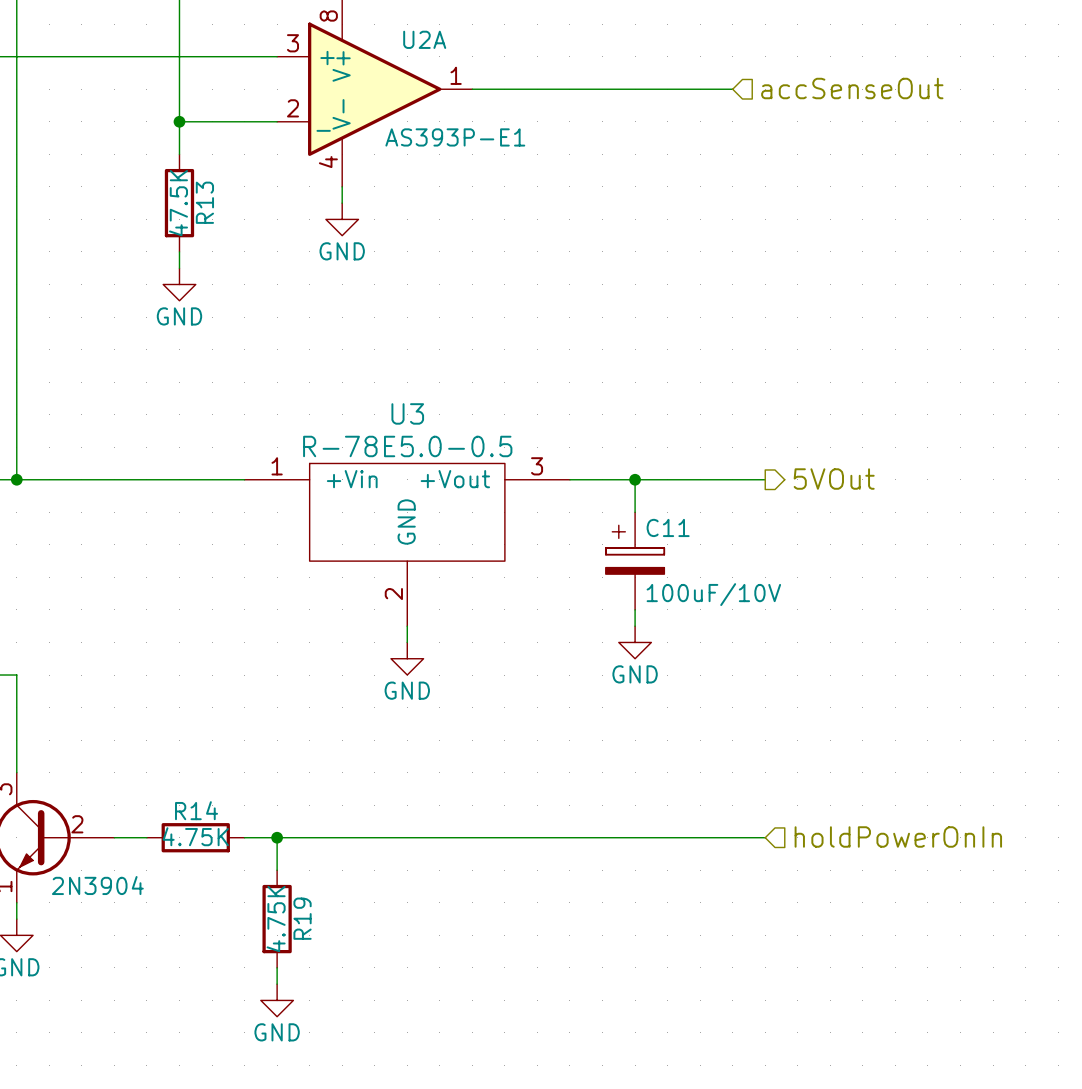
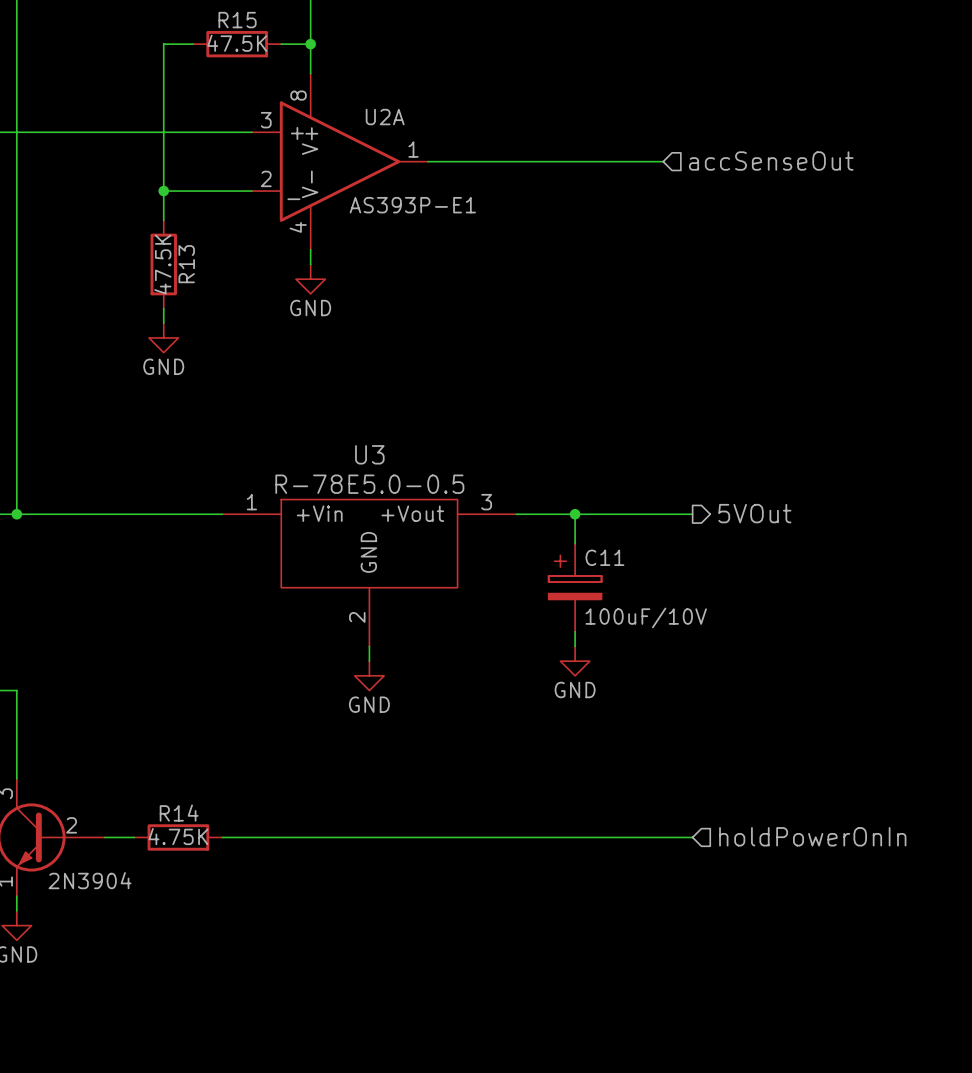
wire: (277, 837) (277, 870) -> none
junction: (277, 837) -> none
R19: 4.75K (277, 919) -> none
wire: (277, 967) (277, 984) -> none
power symbol: GND (277, 1000) -> none

